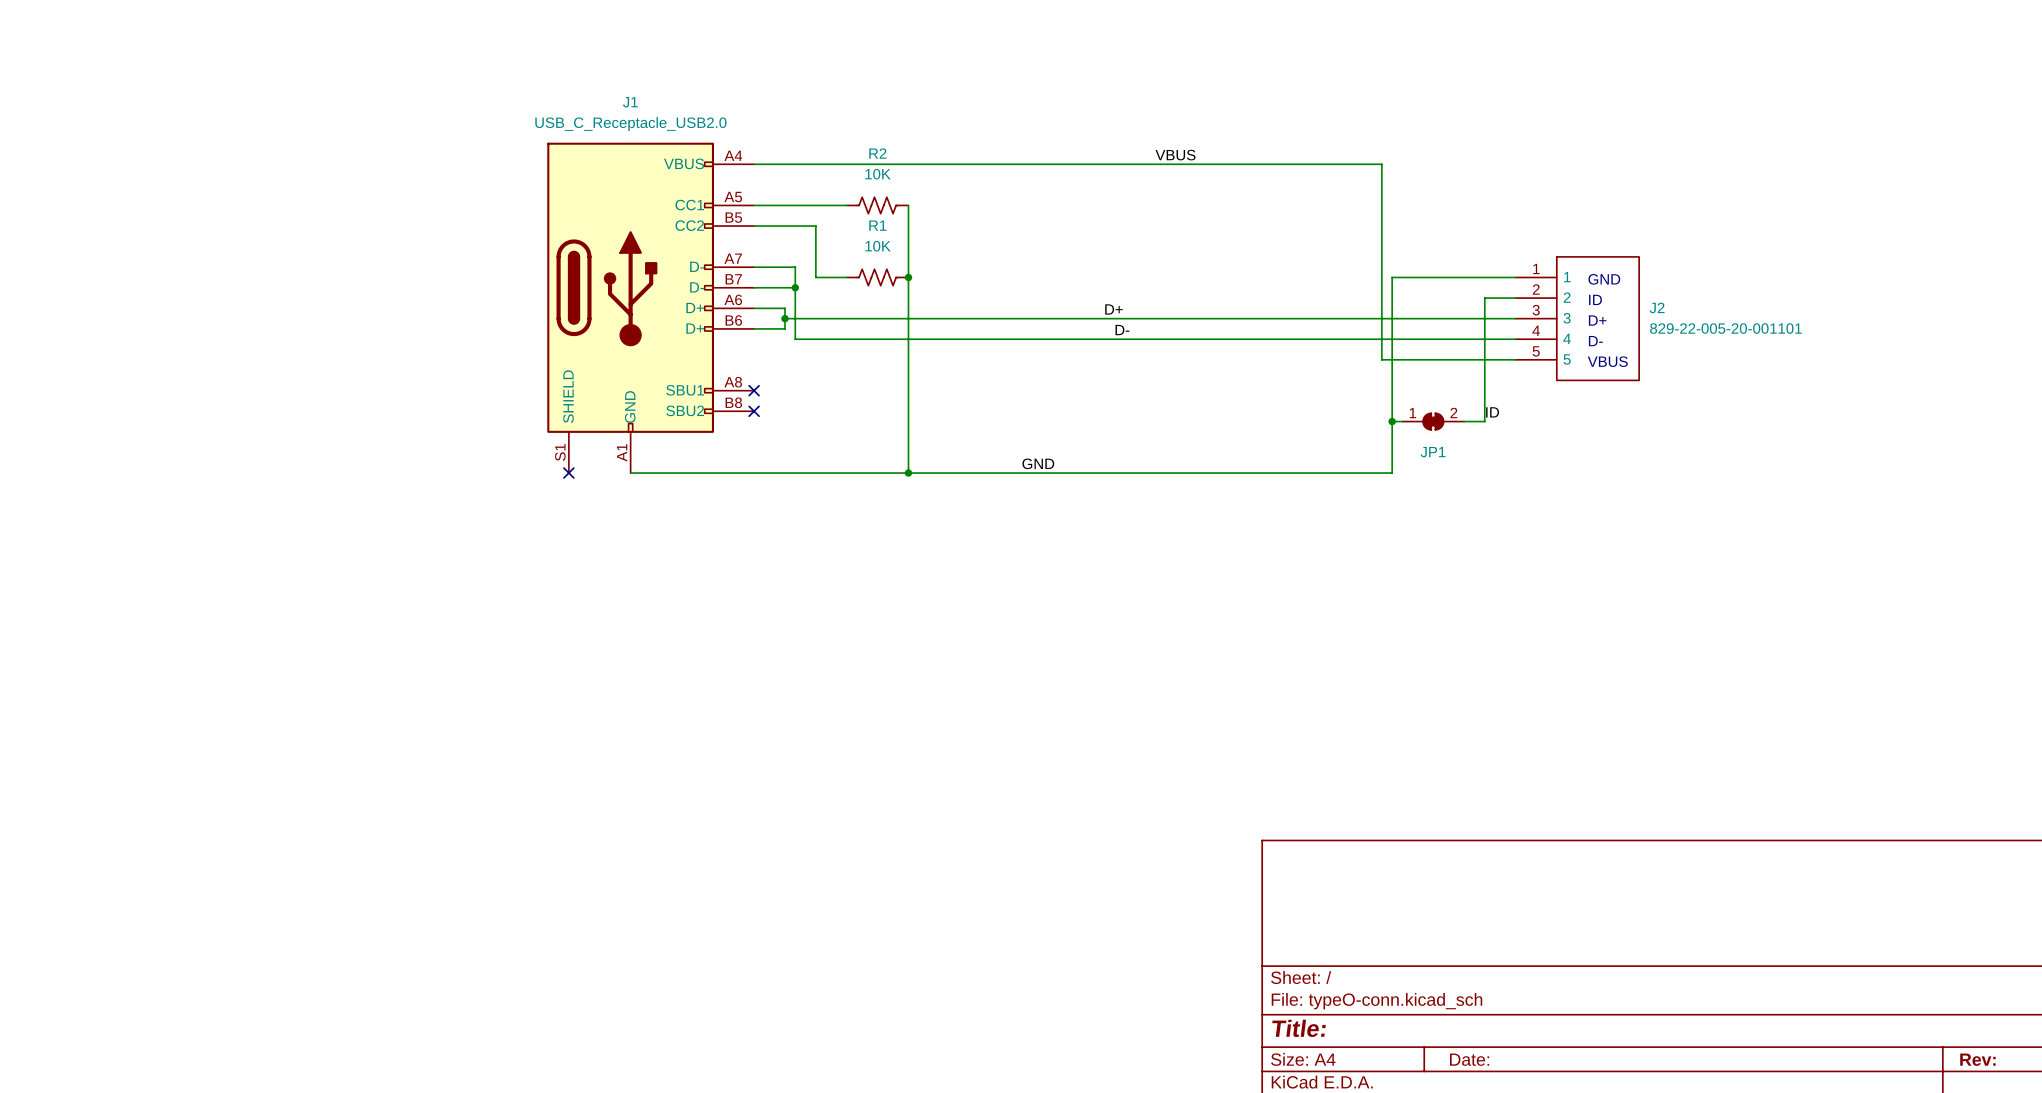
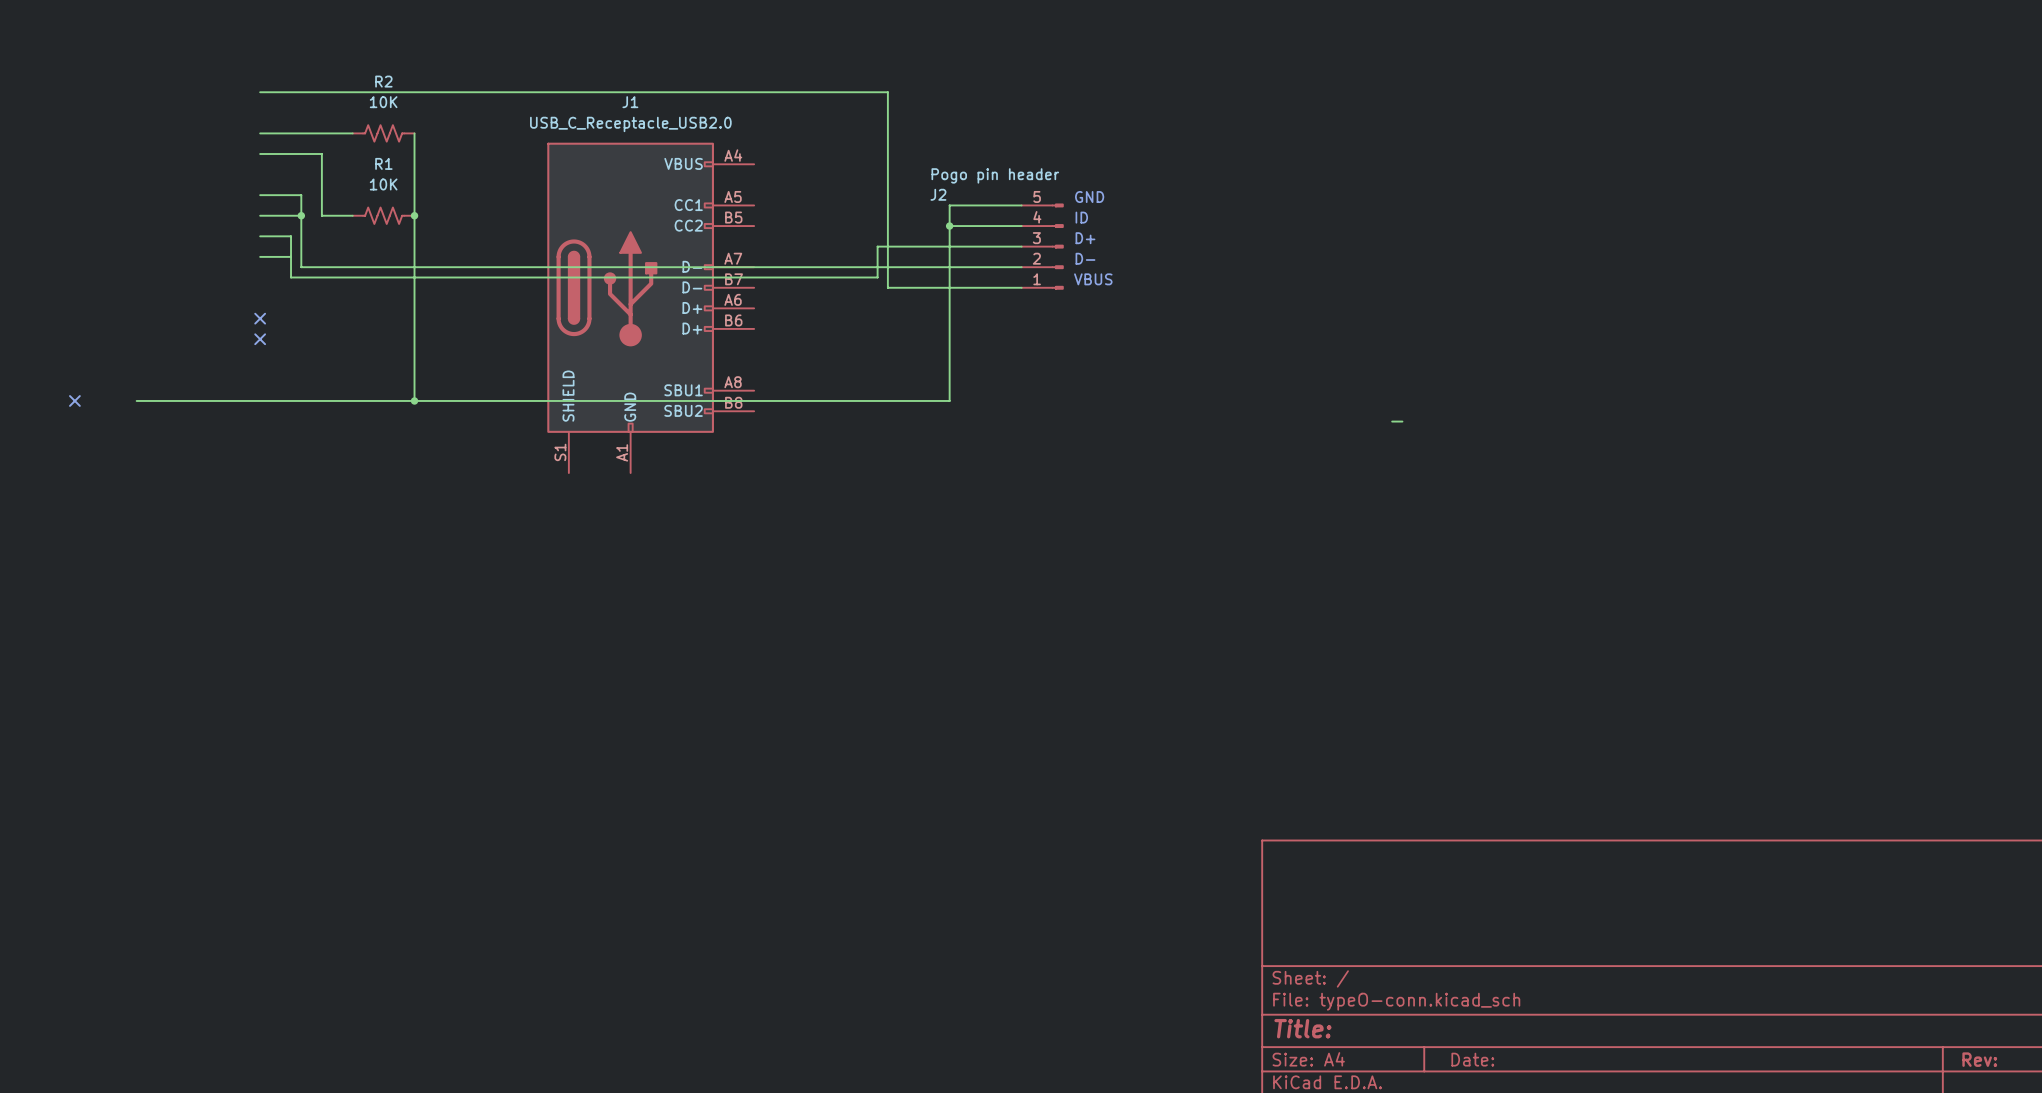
wire: none -> (260, 92) (887, 92) (887, 287) (1021, 287)
wire: none -> (260, 133) (352, 133)
wire: none -> (414, 133) (414, 400)
wire: none -> (260, 154) (321, 154) (321, 215) (352, 215)
label: VBUS (1175, 155) -> none
wire: (754, 164) (1381, 164) (1381, 359) (1515, 359) -> none
wire: none -> (260, 195) (301, 195) (301, 267) (754, 267)
text: none -> GND (1089, 197)
wire: (754, 205) (846, 205) -> none
R2 position: (877, 205) -> (383, 133)
wire: (908, 205) (908, 473) -> none
wire: none -> (1021, 205) (949, 205) (949, 400) (136, 400)
wire: none -> (260, 215) (301, 215)
junction: none -> (301, 215)
junction: none -> (414, 215)
text: none -> ID (1081, 217)
wire: (754, 226) (815, 226) (815, 277) -> (260, 236) (291, 236) (291, 277) (815, 277)
wire: none -> (949, 226) (1021, 226)
junction: none -> (949, 226)
text: none -> D+ (1085, 238)
wire: none -> (1021, 246) (877, 246) (877, 277) (846, 277)
wire: none -> (260, 256) (291, 256)
J2 symbol: [1515, 256, 1640, 382] -> [1021, 203, 1064, 290]
text: none -> D- (1085, 258)
wire: (795, 267) (795, 339) (1515, 339) -> (795, 267) (1021, 267)
R1 position: (877, 277) -> (383, 215)
junction: (908, 277) -> none
wire: (1515, 277) (1392, 277) (1392, 473) (630, 473) -> none
text: none -> VBUS (1093, 279)
text: GND (1604, 279) -> none
wire: (754, 287) (795, 287) -> none
junction: (795, 287) -> none
wire: (1515, 298) (1484, 298) (1484, 421) (1464, 421) -> none
text: ID (1595, 299) -> none
J2 name position: J2 (1657, 307) -> J2 (938, 194)
wire: (754, 308) (784, 308) (784, 328) (754, 328) -> none
label: D+ (1114, 309) -> none
no-connect mark: none -> (260, 318)
wire: (784, 318) (1515, 318) -> none
junction: (784, 318) -> none
text: D+ (1597, 320) -> none
J2 value: 829-22-005-20-001101 (1725, 328) -> Pogo pin header (995, 175)
label: D- (1122, 330) -> none
no-connect mark: none -> (260, 339)
text: D- (1595, 341) -> none
text: VBUS (1607, 361) -> none
no-connect mark: (754, 390) -> none
no-connect mark: none -> (74, 400)
junction: none -> (414, 400)
no-connect mark: (754, 411) -> none
label: ID (1492, 412) -> none
junction: (1392, 421) -> none
JP1: (1433, 421) -> none
label: GND (1038, 463) -> none
no-connect mark: (568, 473) -> none
junction: (908, 473) -> none

